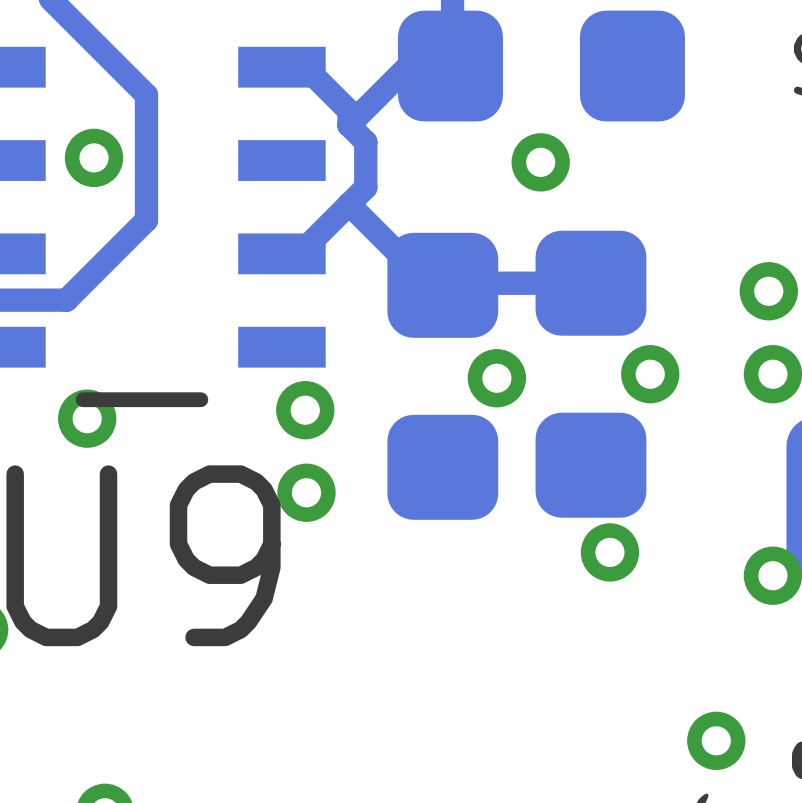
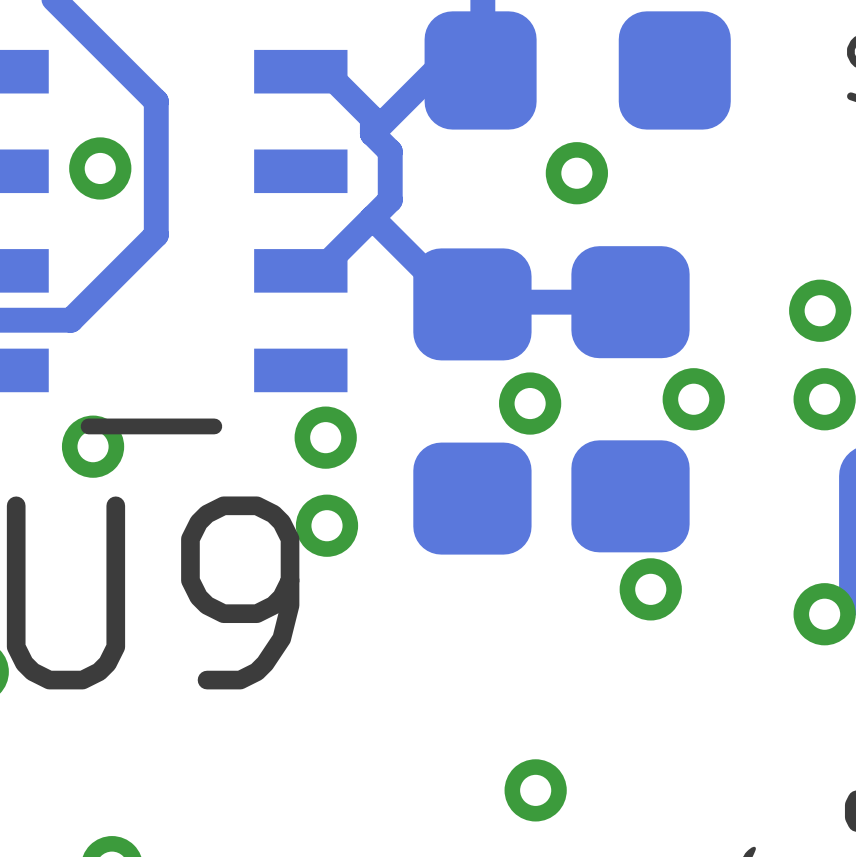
via: none -> (535, 790)
via: (716, 740) -> none

